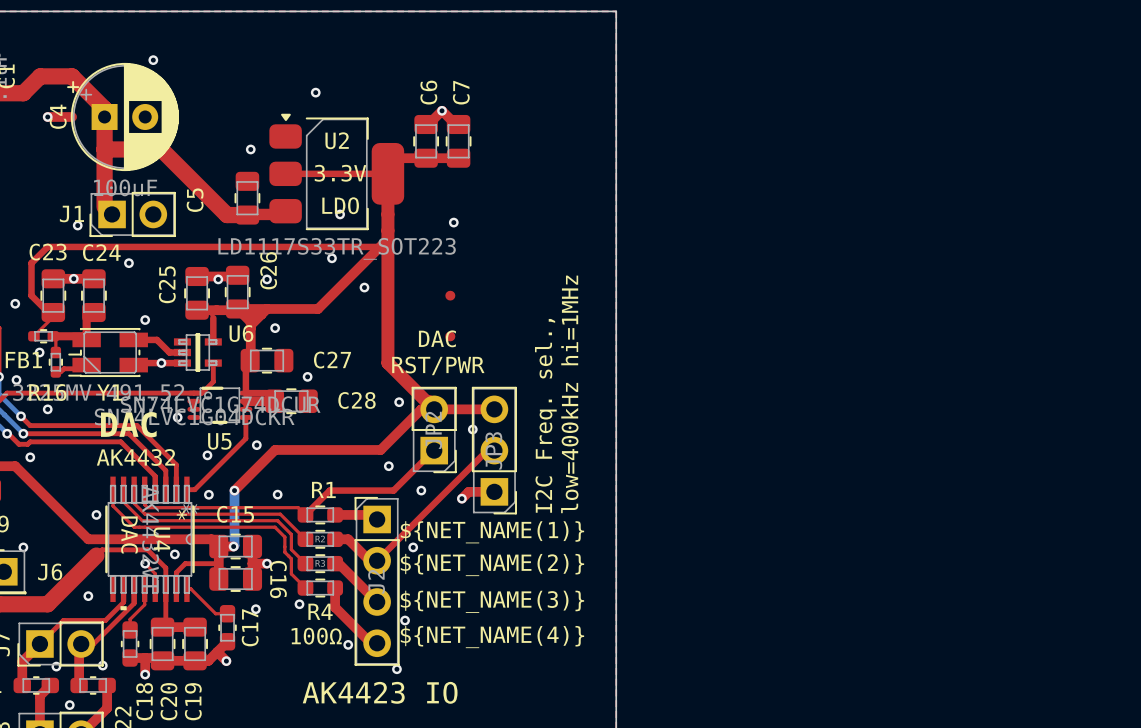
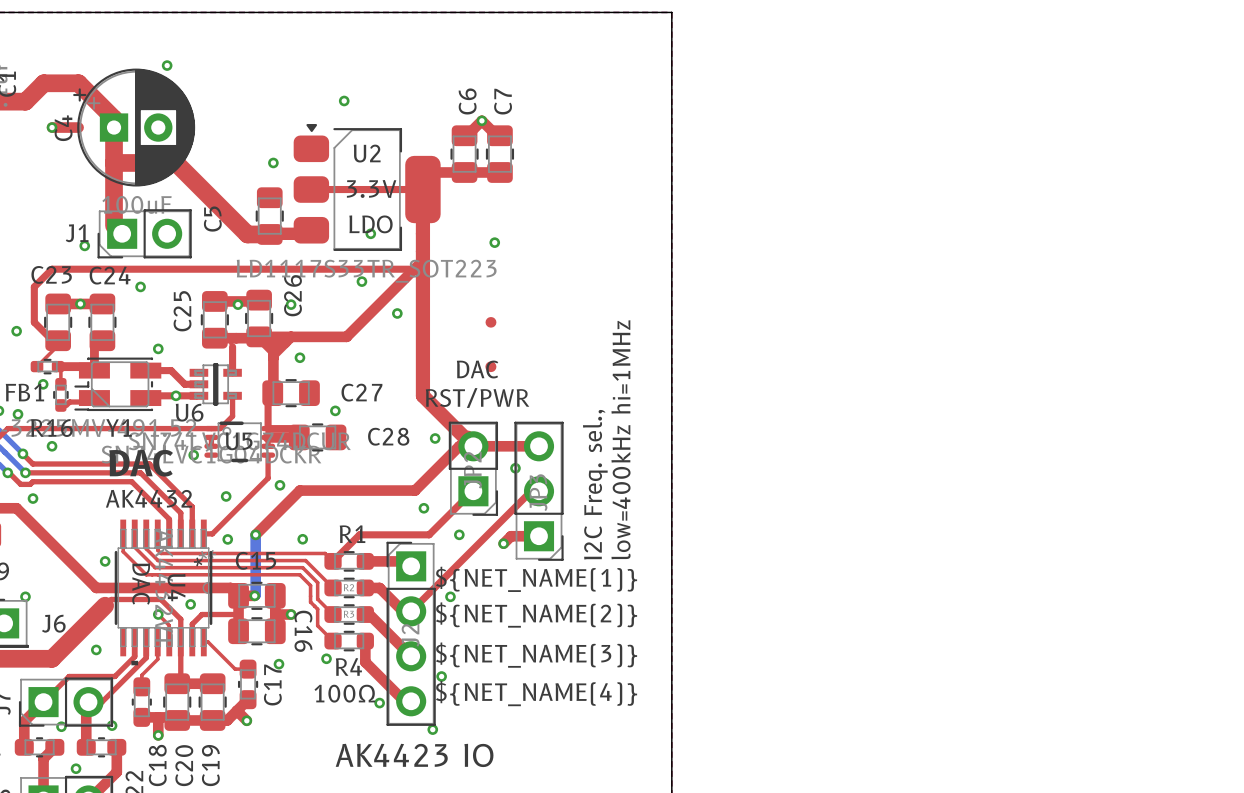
U6 name position: U6 (241, 333) -> U6 (189, 412)
U5 name position: U5 (219, 441) -> U5 (239, 441)

